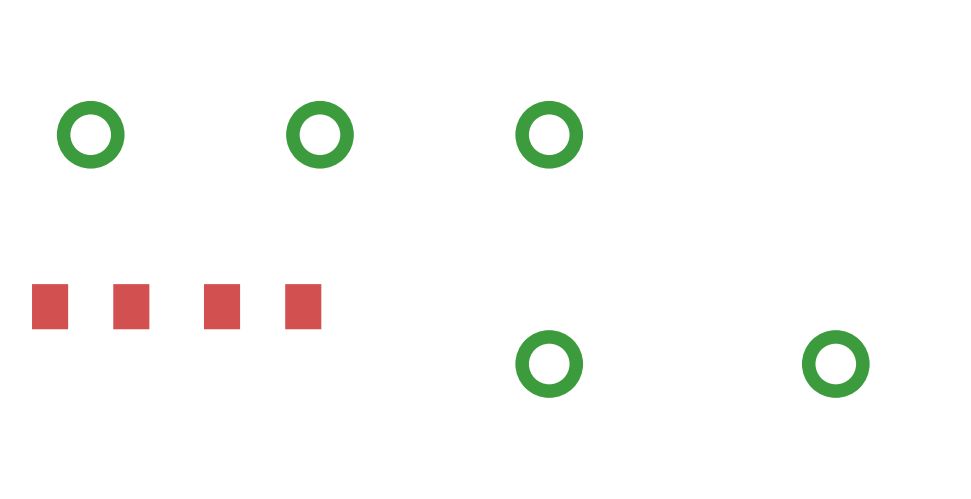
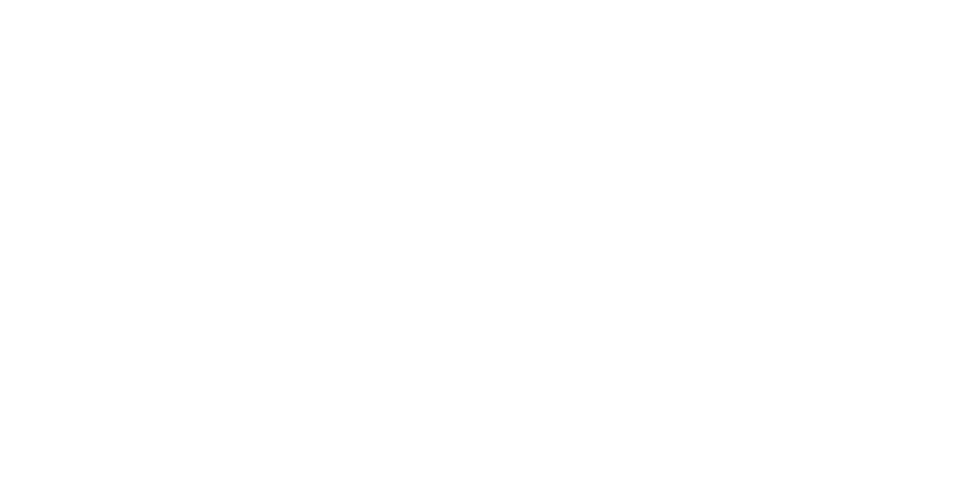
part: (90, 134) -> none
part: (319, 134) -> none
part: (549, 134) -> none
part: (90, 306) -> none
part: (262, 306) -> none
part: (549, 364) -> none
part: (835, 364) -> none

